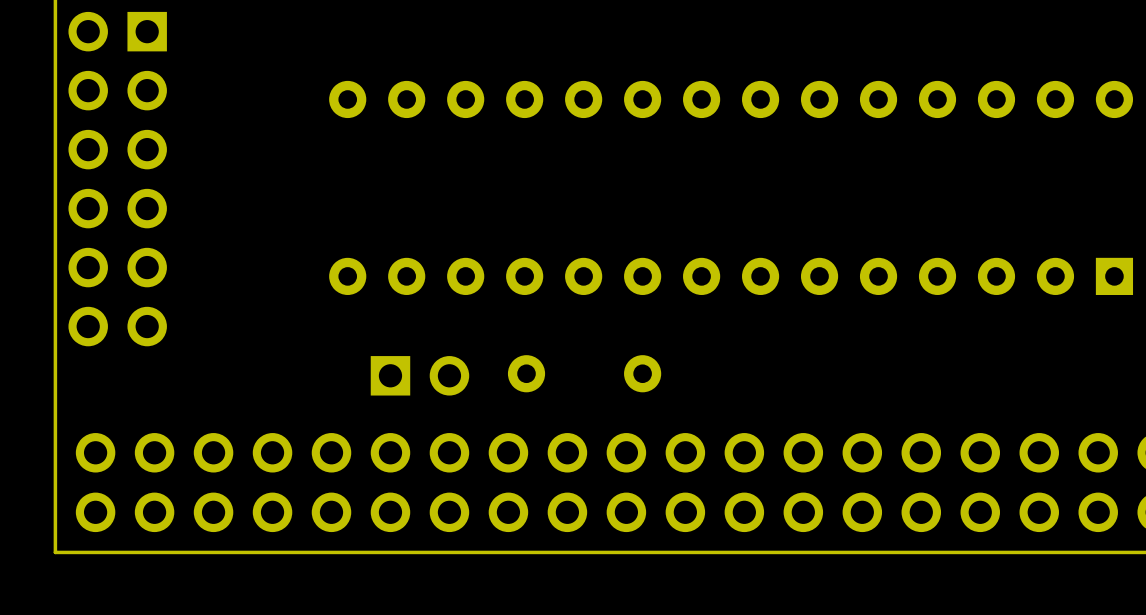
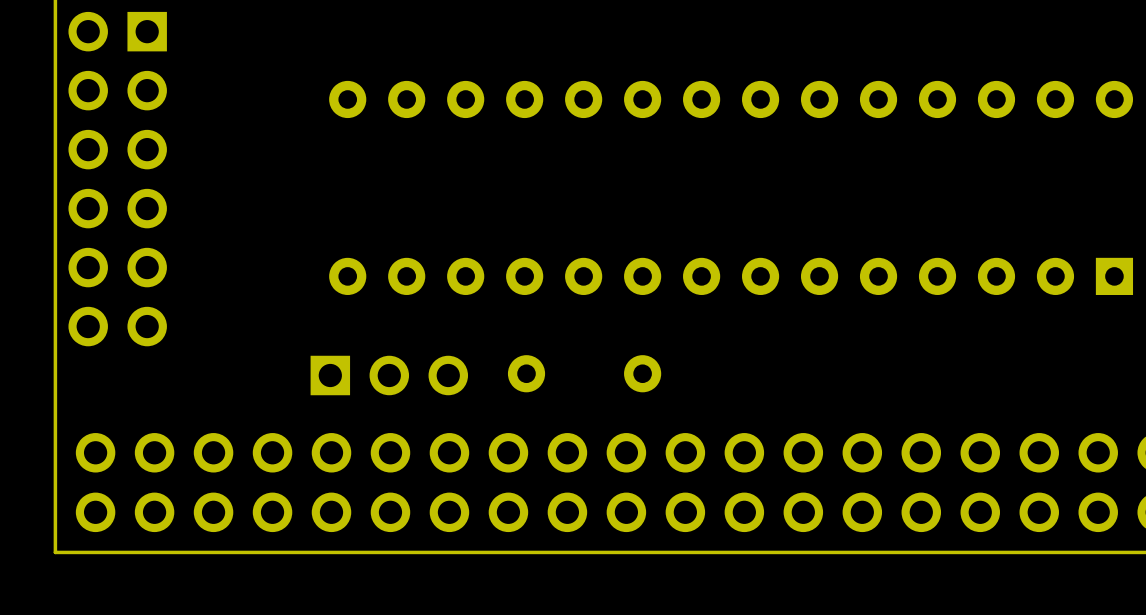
part: none -> (389, 375)
part: (419, 375) -> none

